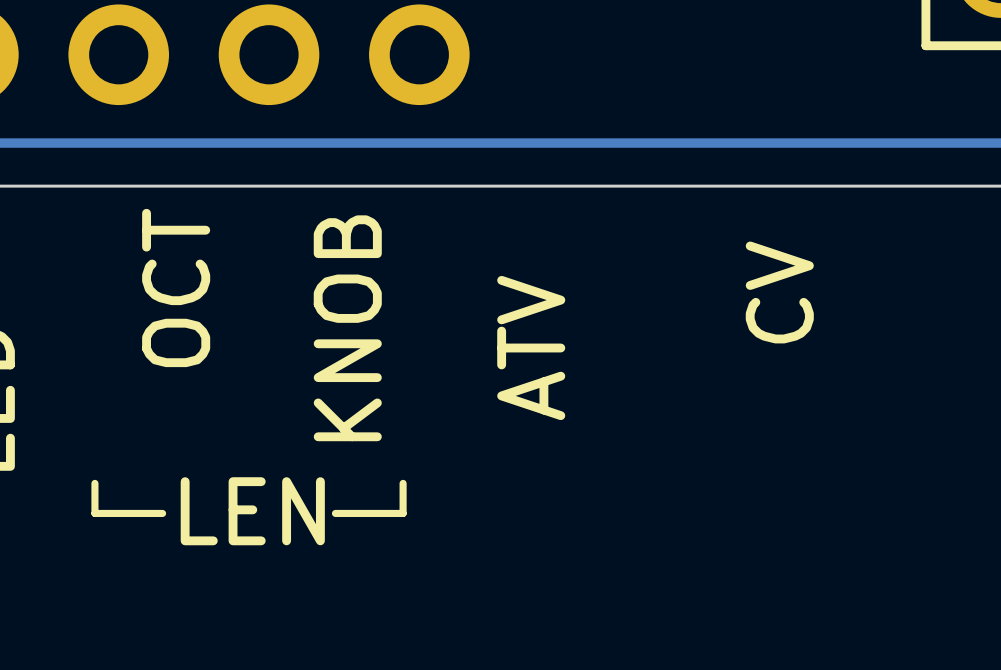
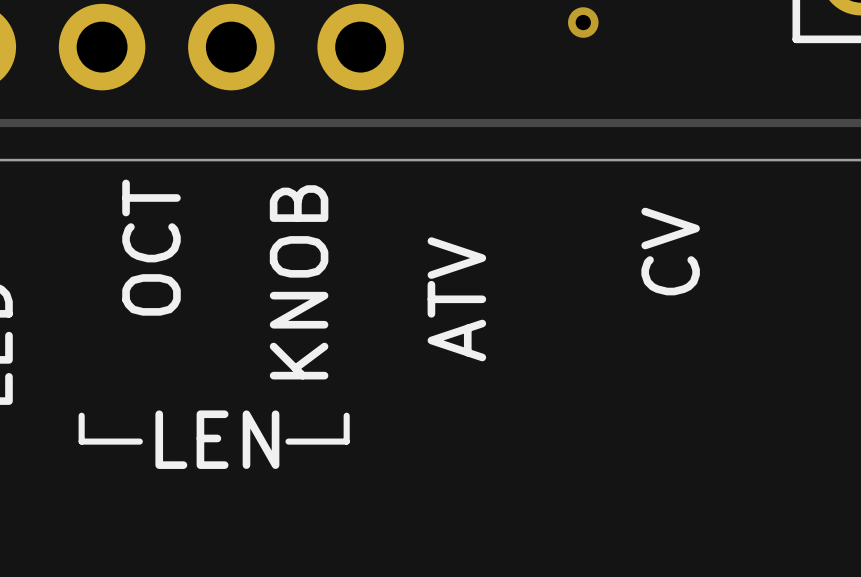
via: none -> (583, 22)

